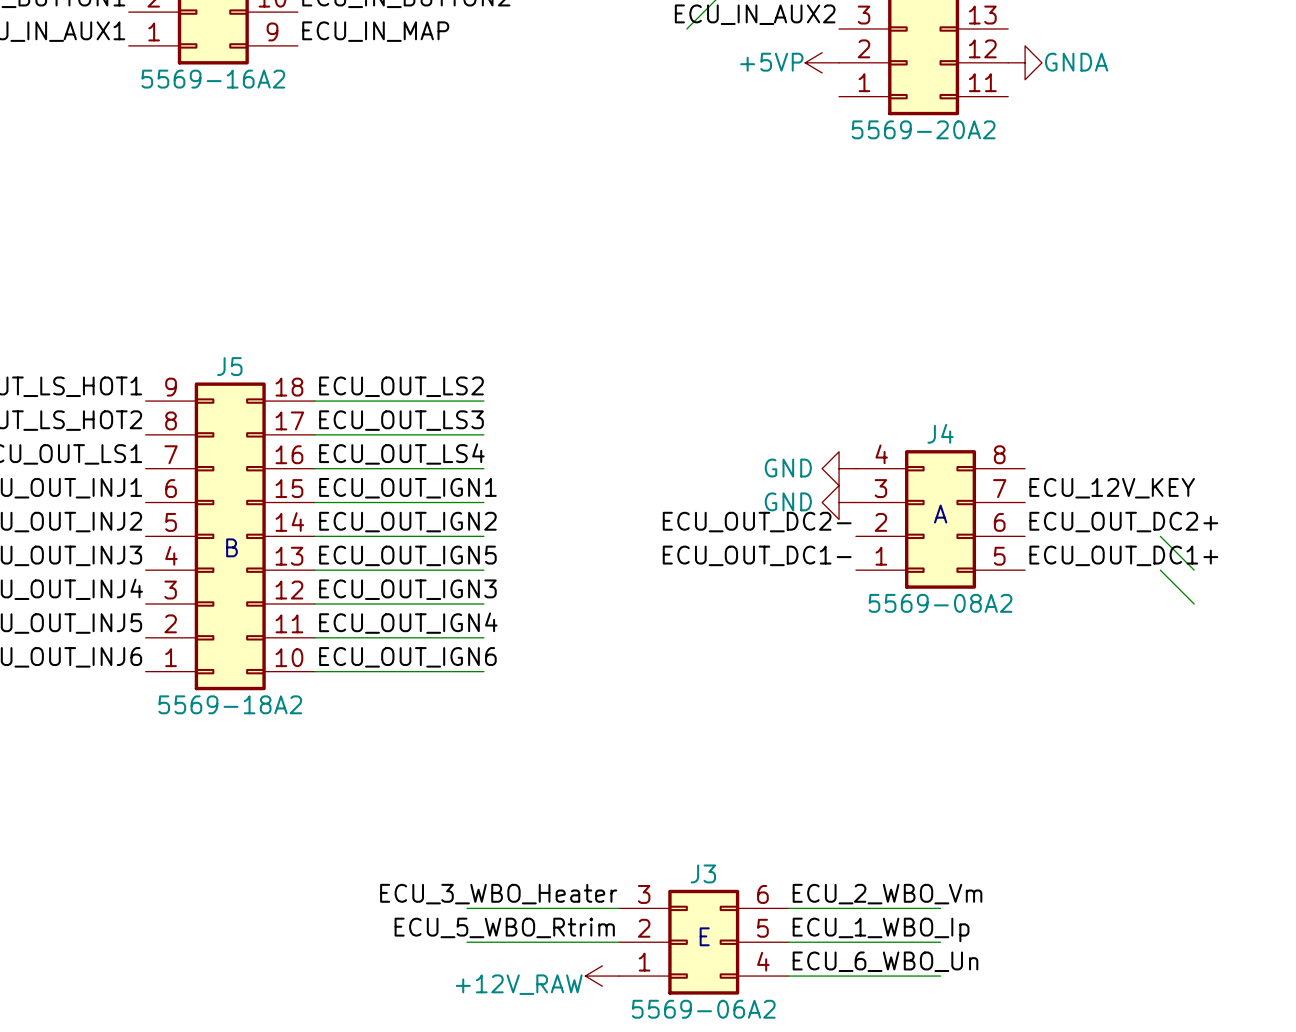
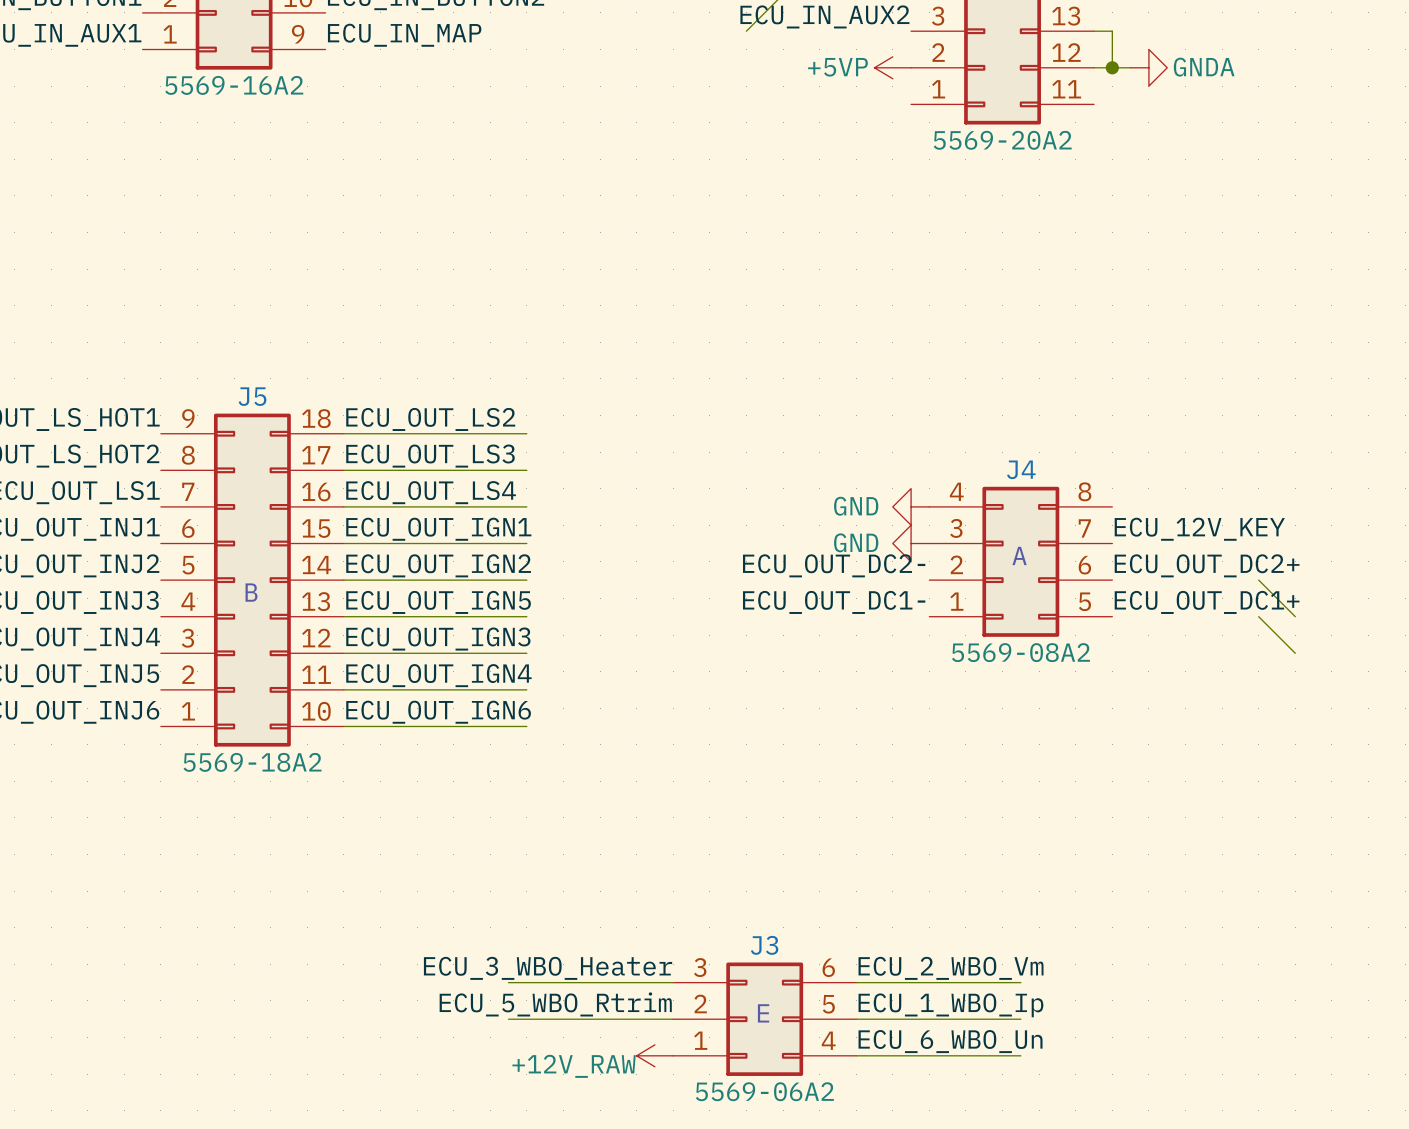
wire: none -> (1094, 31) (1112, 31) (1112, 67)
power symbol position: GNDA (1025, 62) -> GNDA (1148, 67)
junction: none -> (1112, 67)

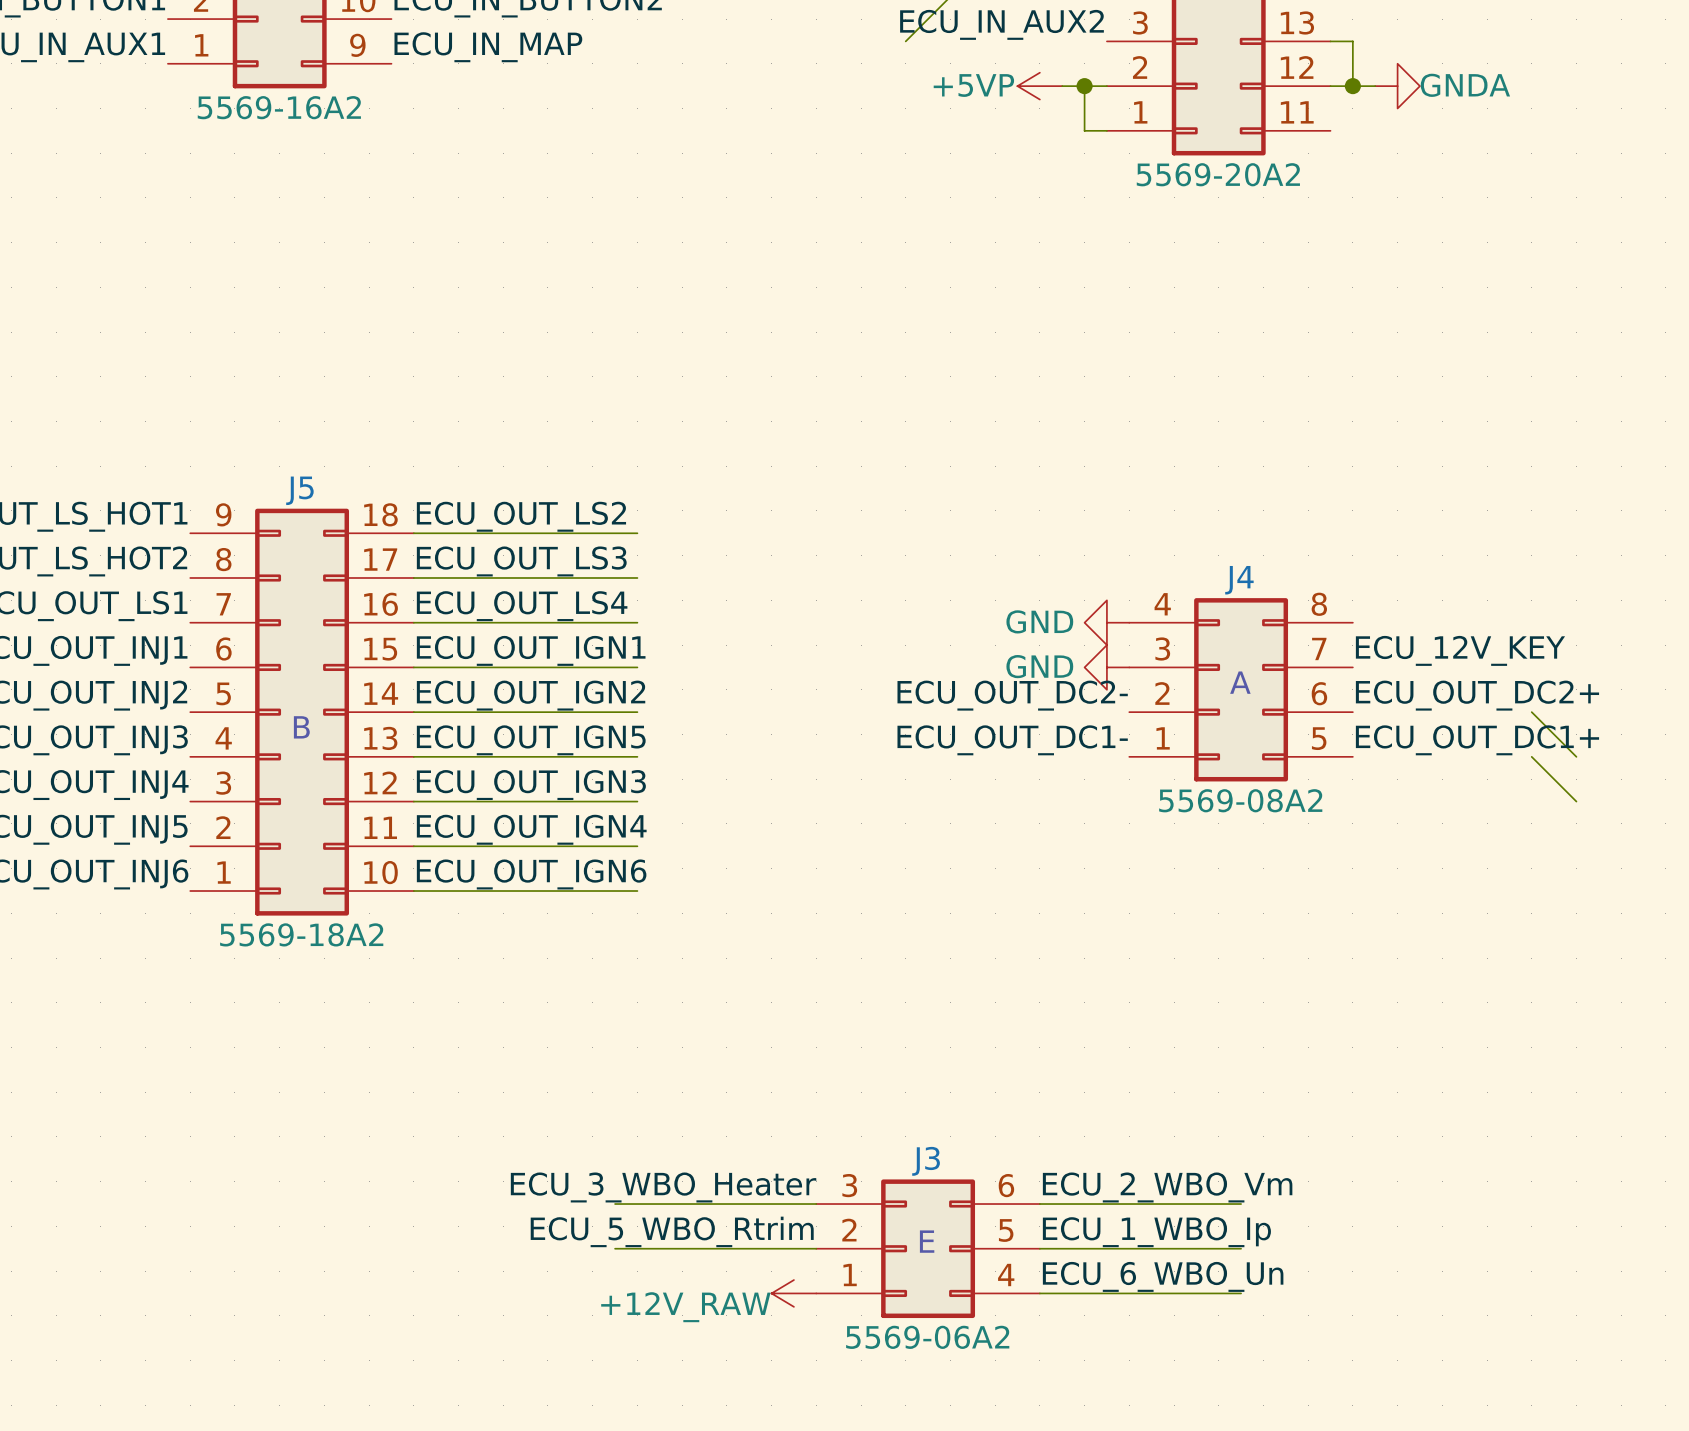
wire: none -> (1084, 86) (1084, 130) (1106, 130)
power symbol position: +5VP (892, 67) -> +5VP (1039, 86)
junction: none -> (1084, 86)

